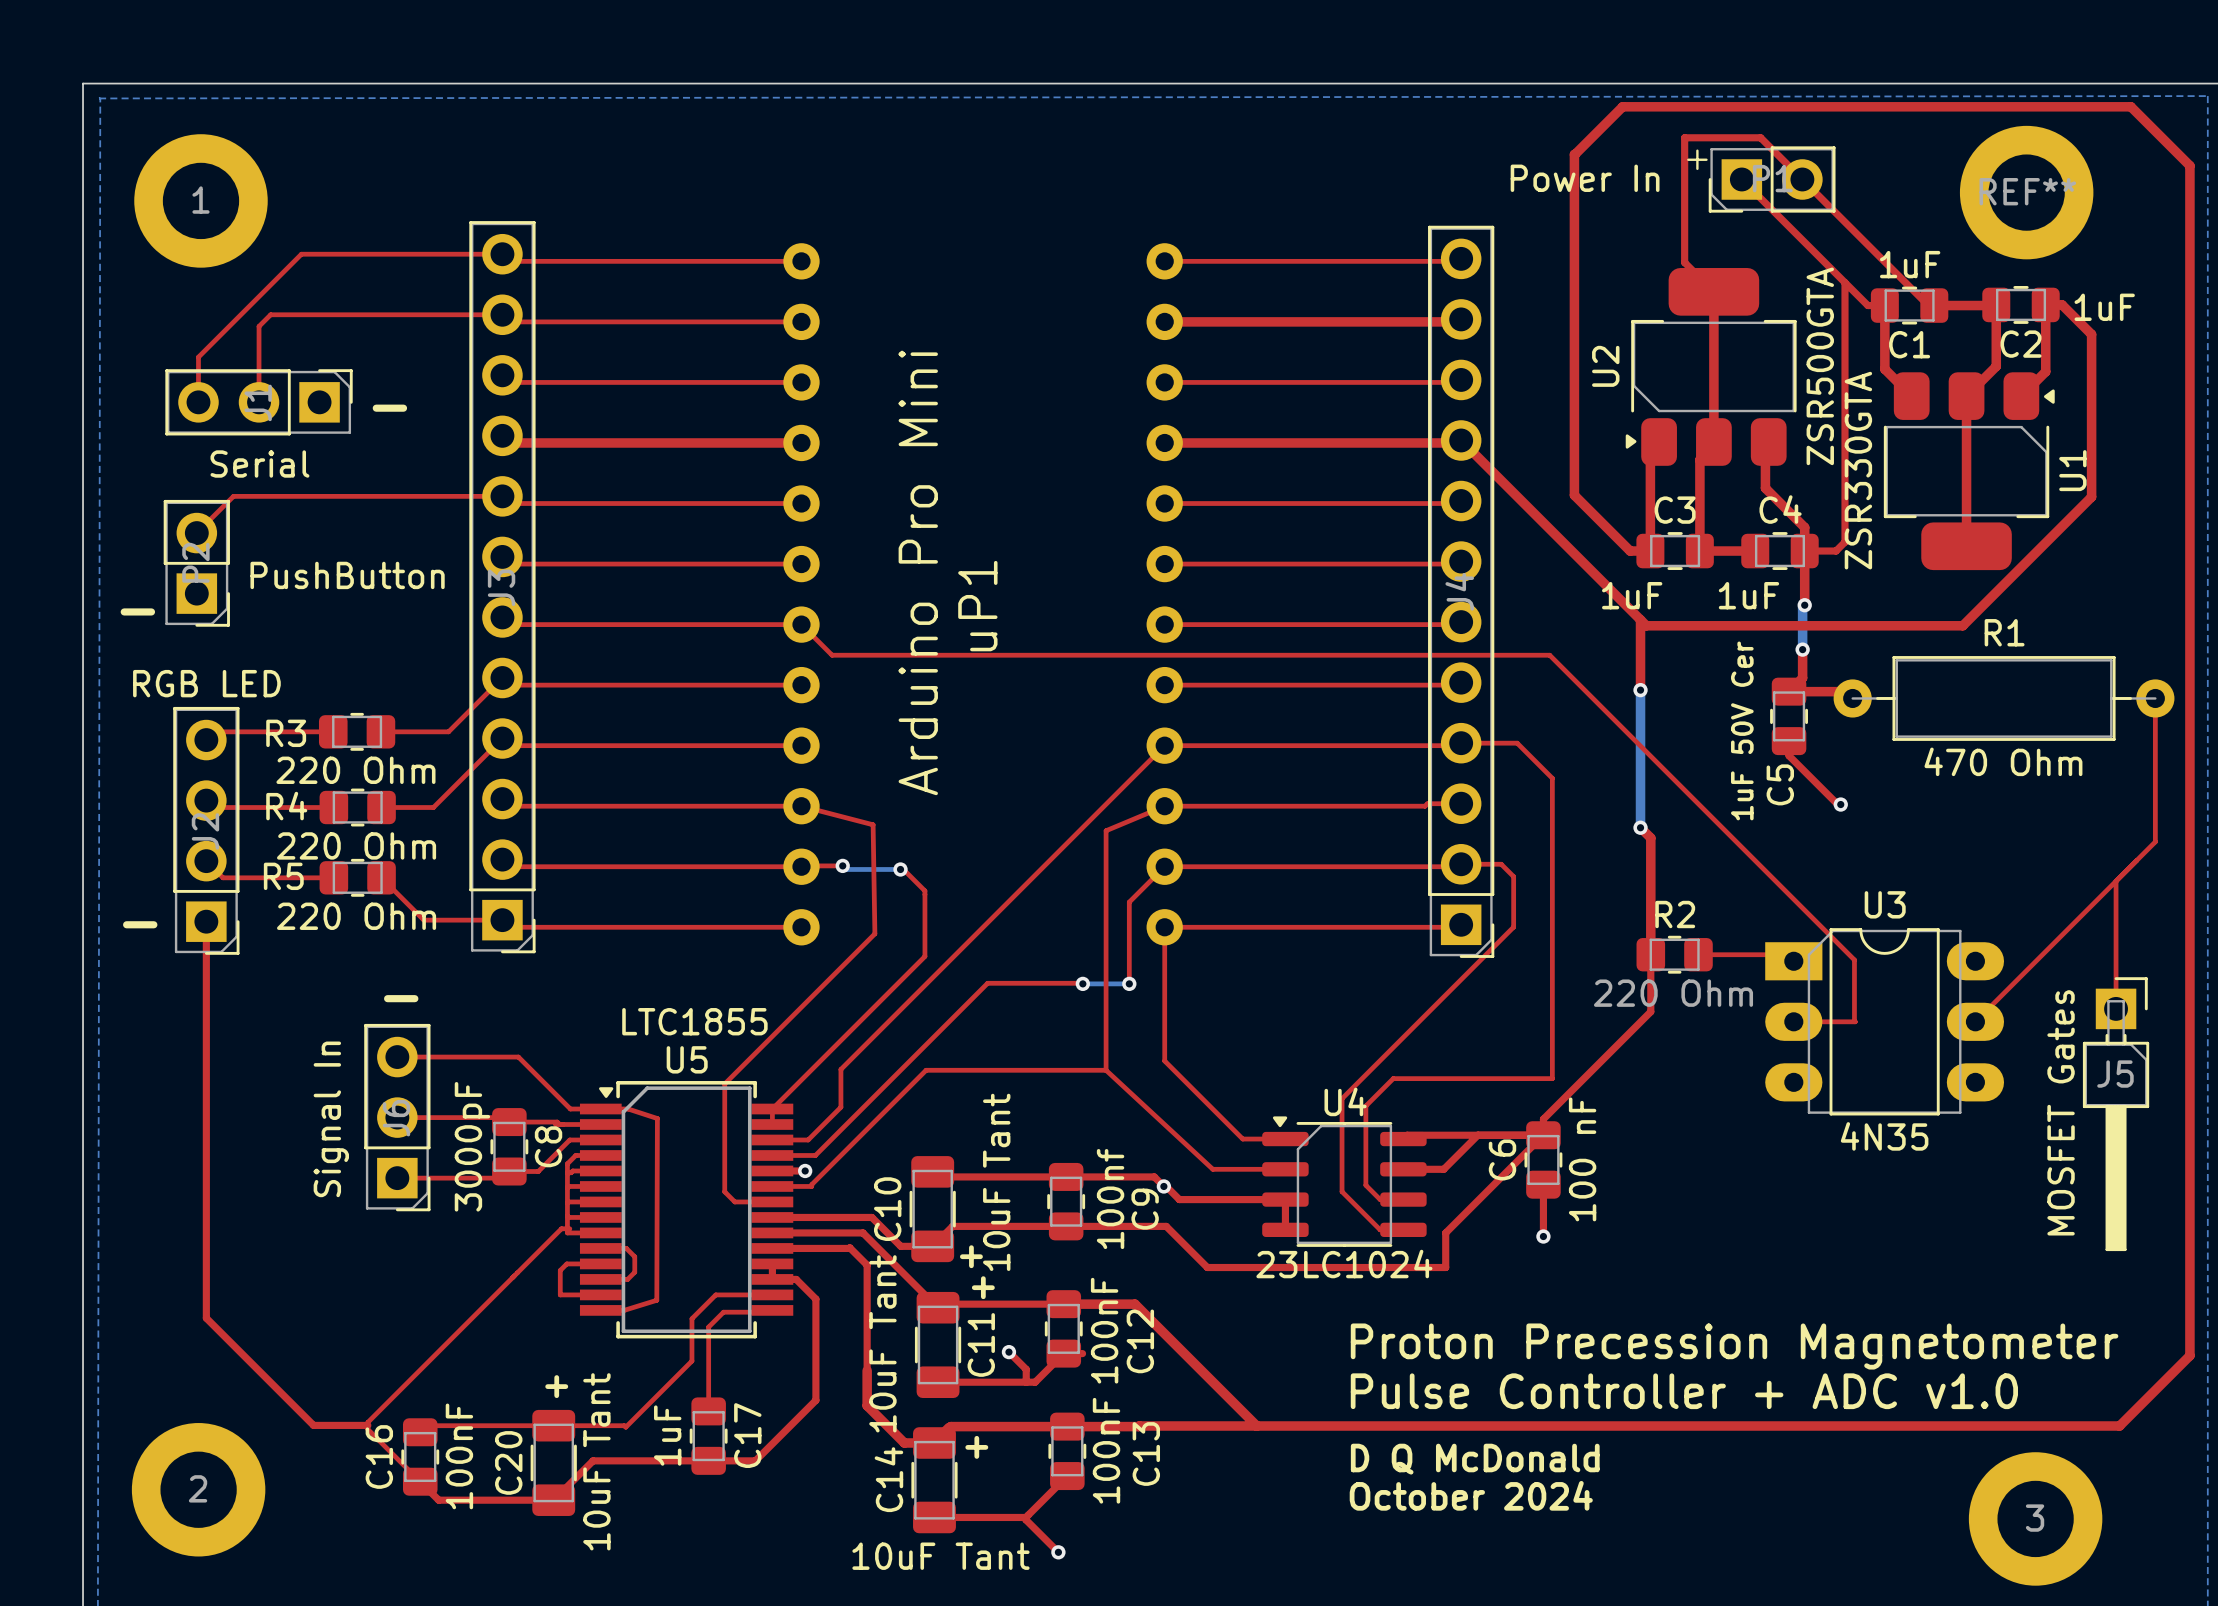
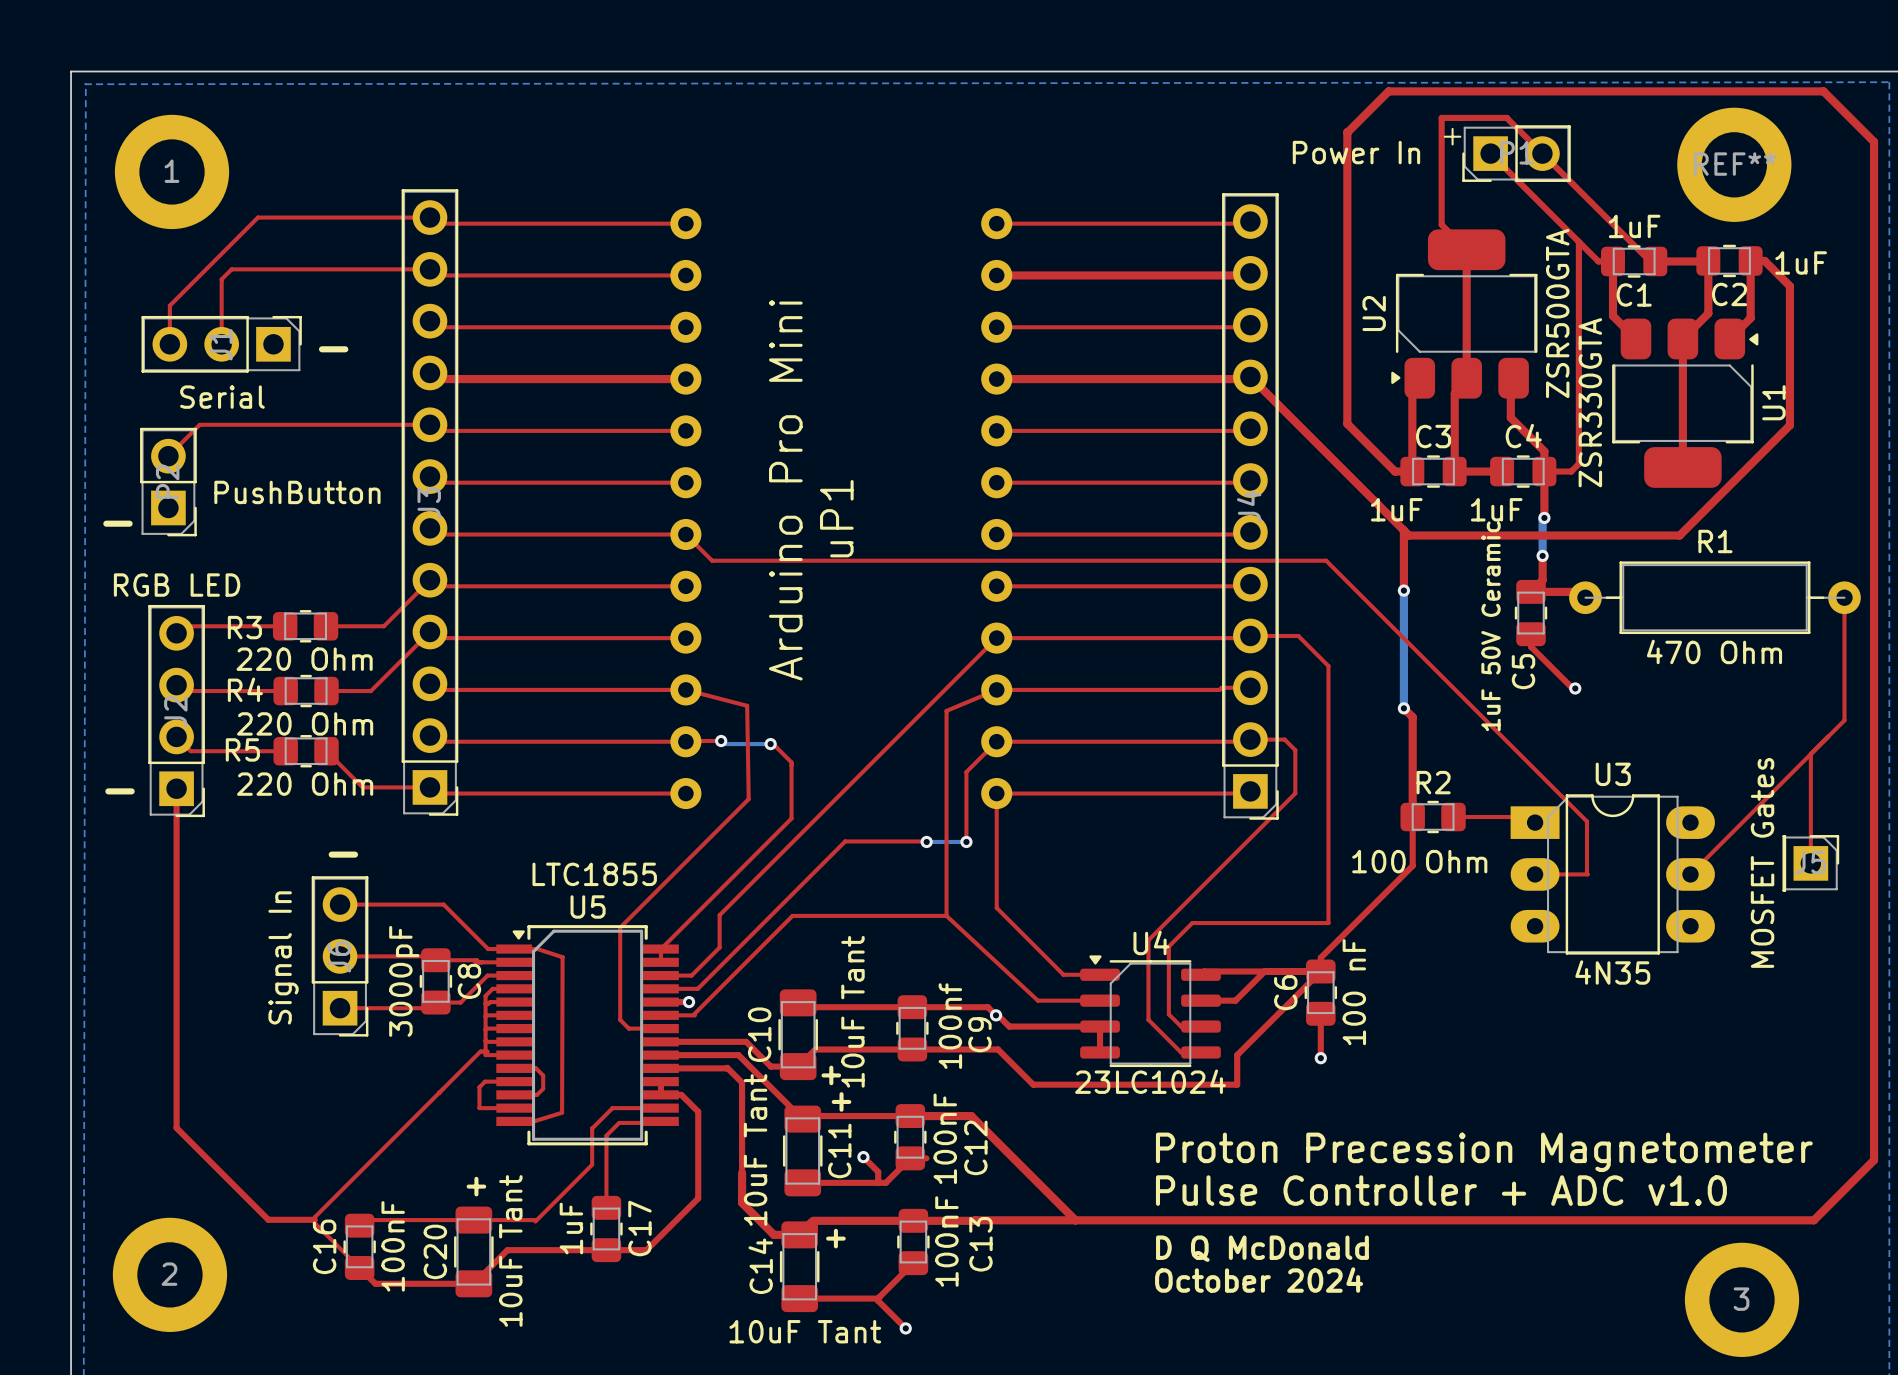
C5 value: 1uF 50V Cer (1742, 730) -> 1uF 50V Ceramic (1491, 626)
J5 footprint: [2082, 977, 2150, 1252] -> [1782, 835, 1840, 892]
R2 value: 220 Ohm (1673, 993) -> 100 Ohm (1419, 861)

